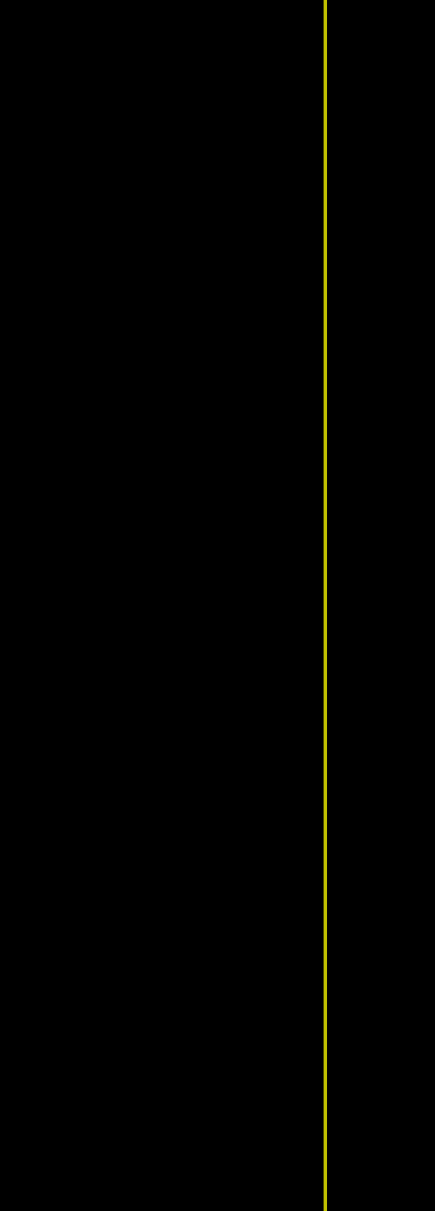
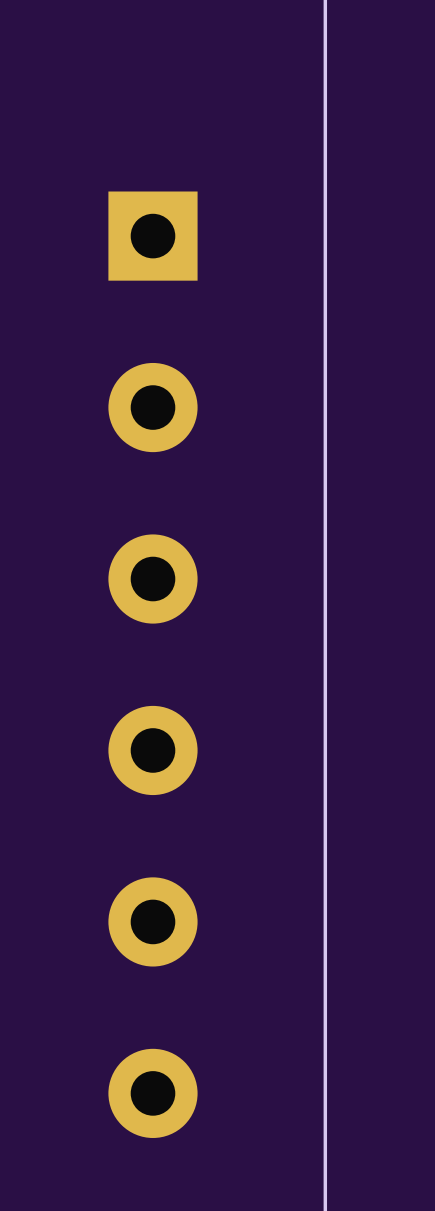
part: none -> (152, 664)

